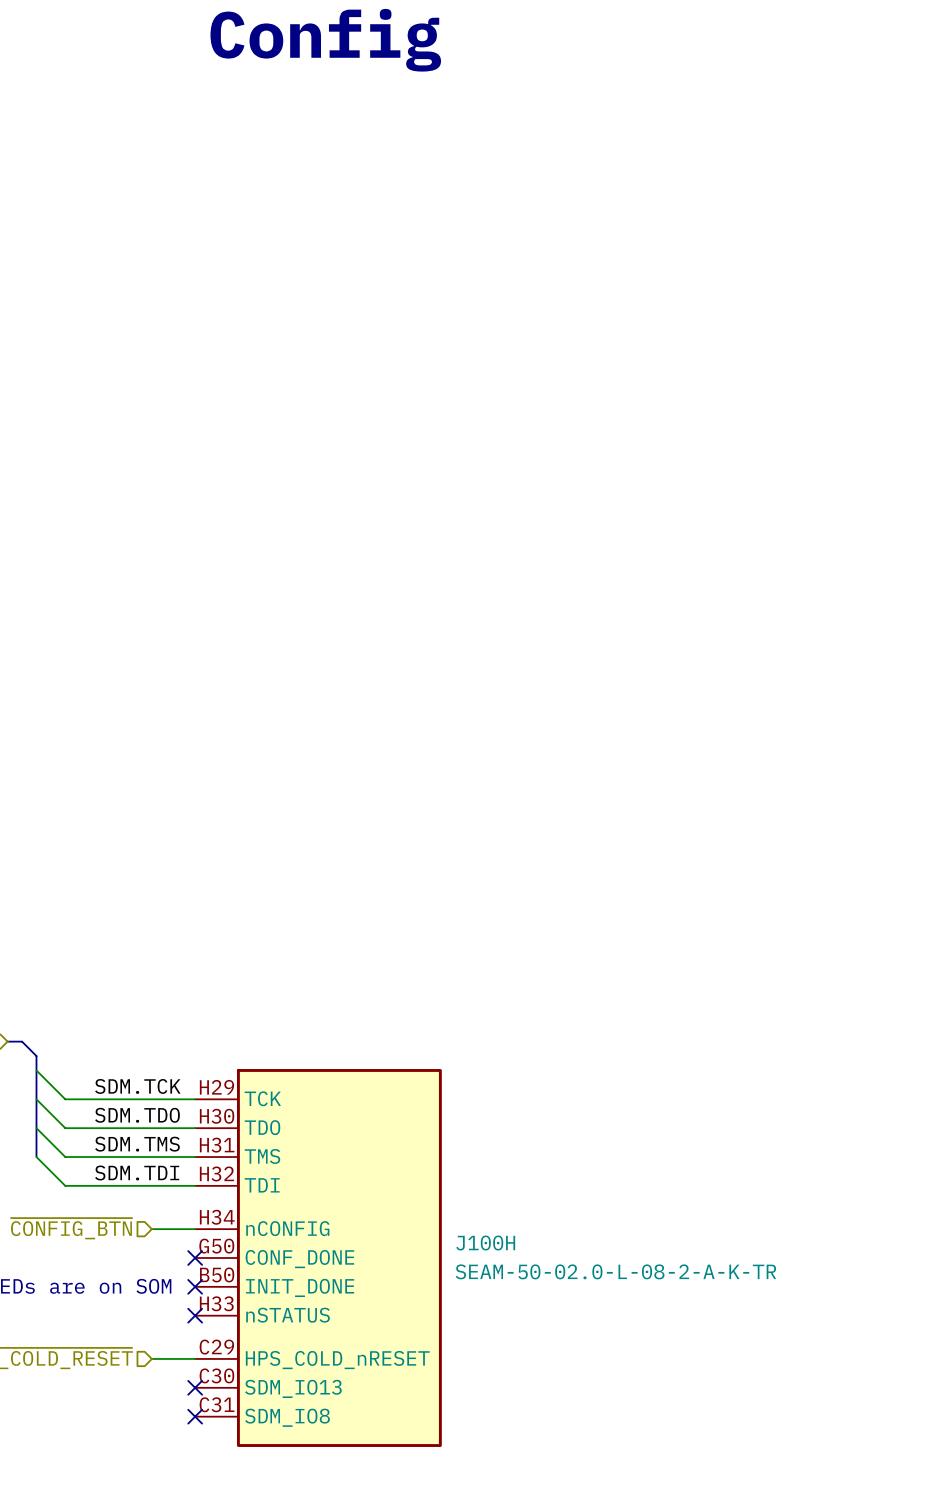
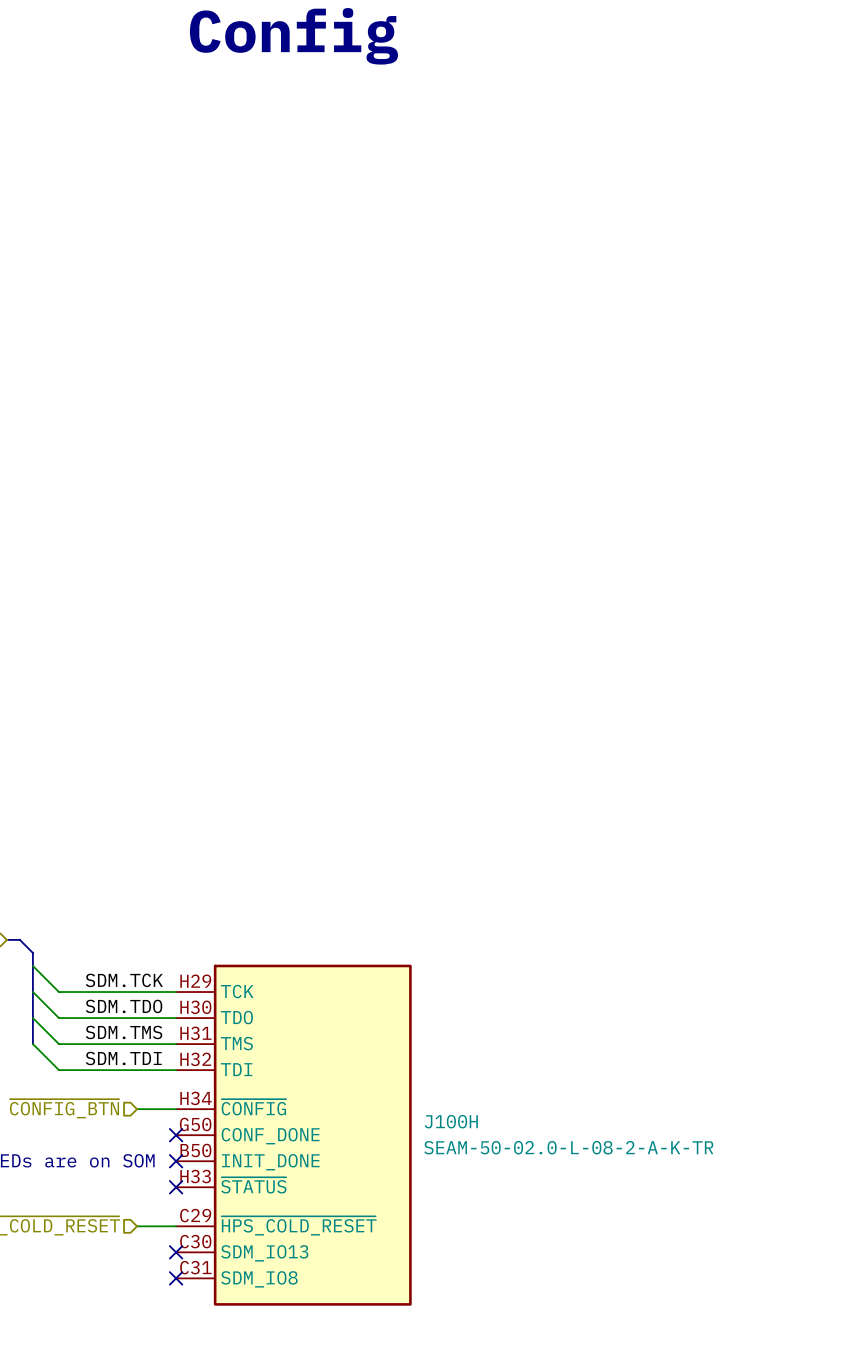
J100H symbol: [195, 1069, 442, 1447] -> [176, 964, 412, 1306]

